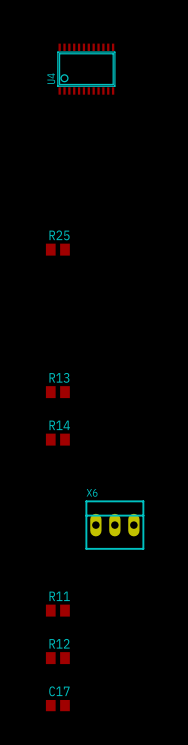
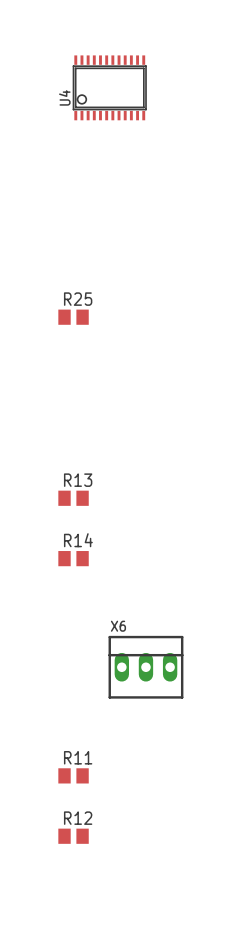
C17: (57, 705) -> none

